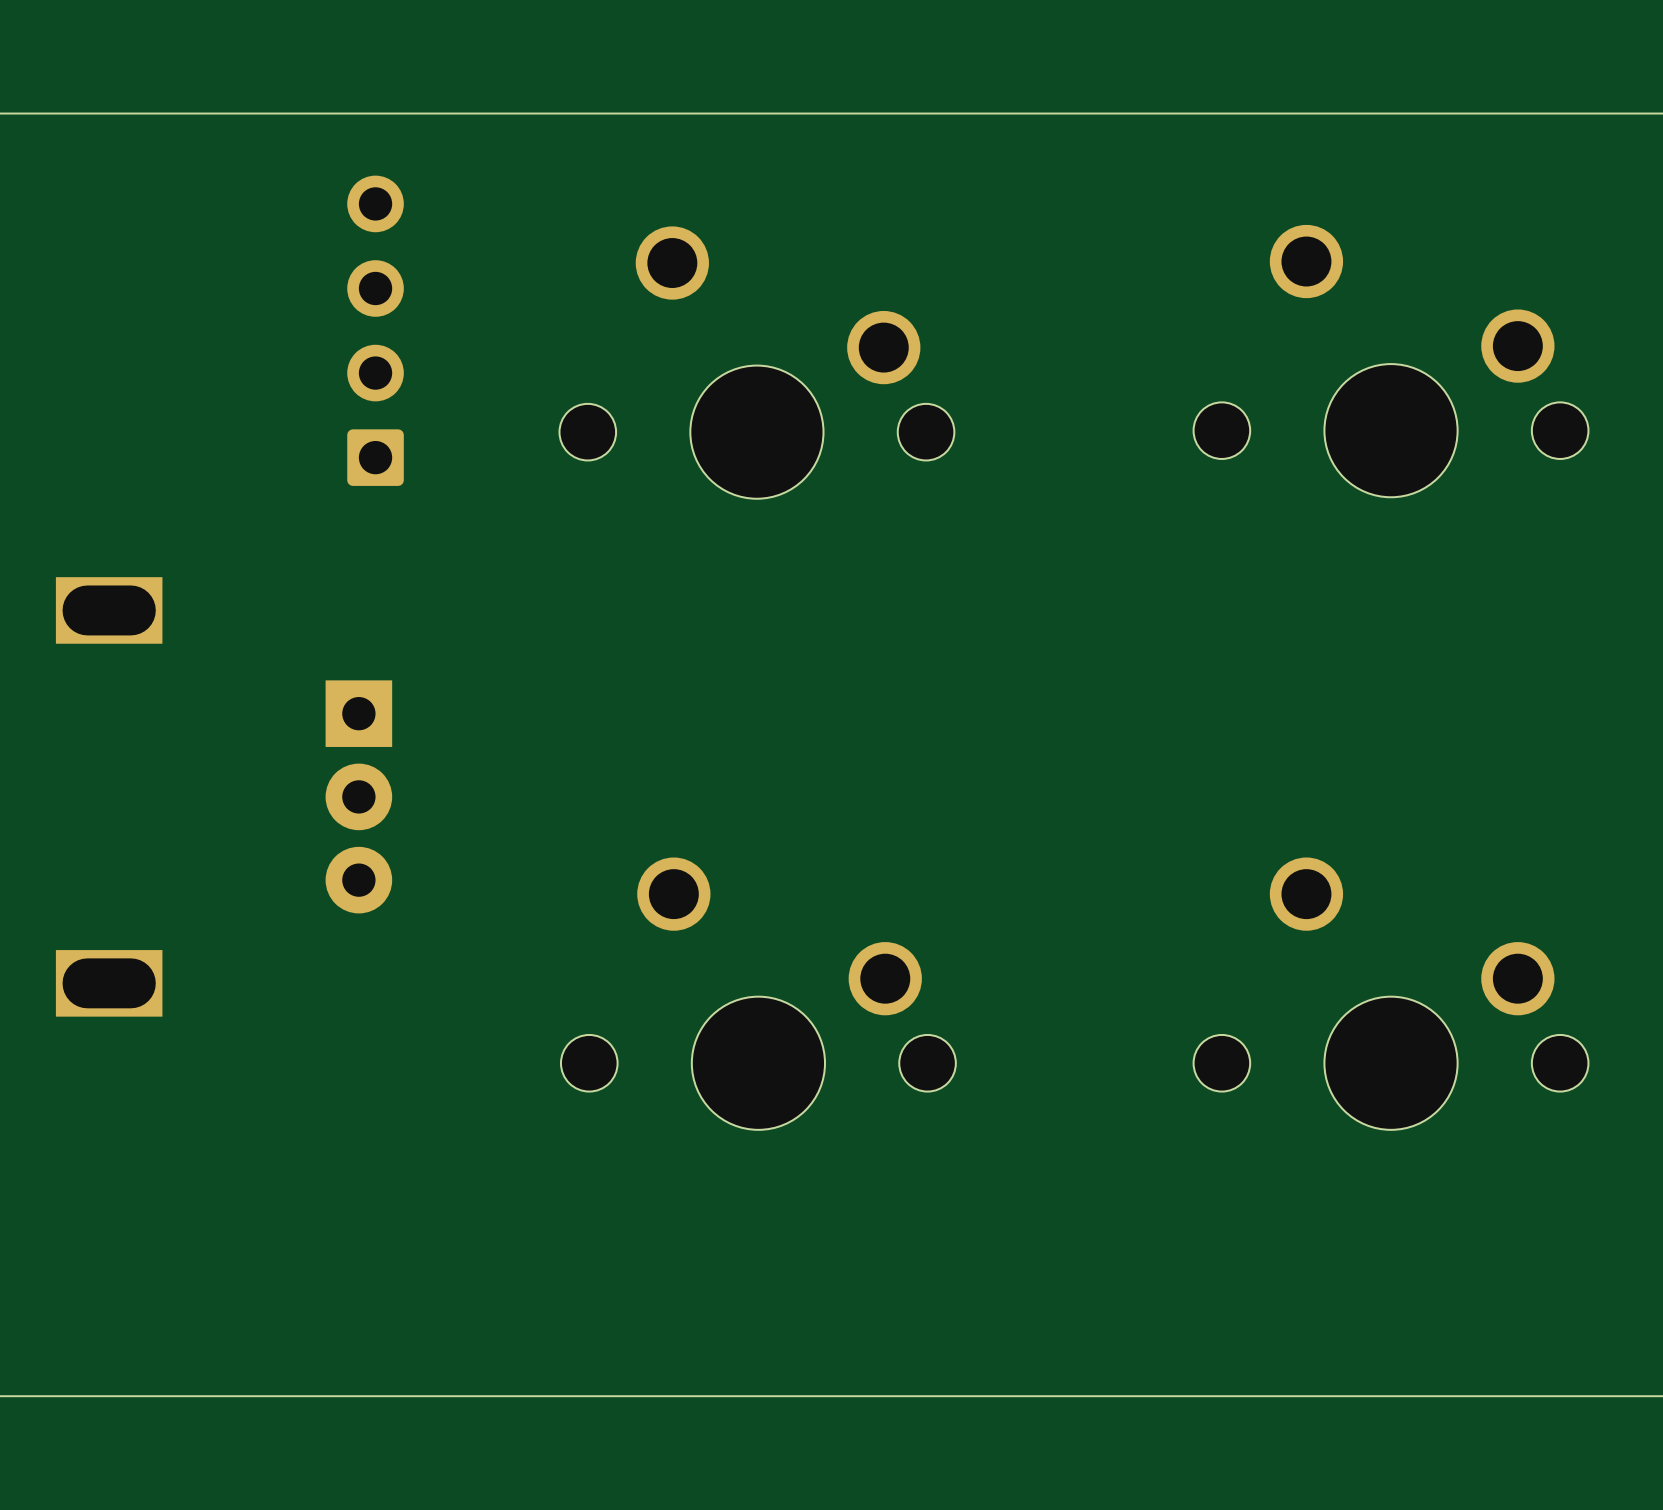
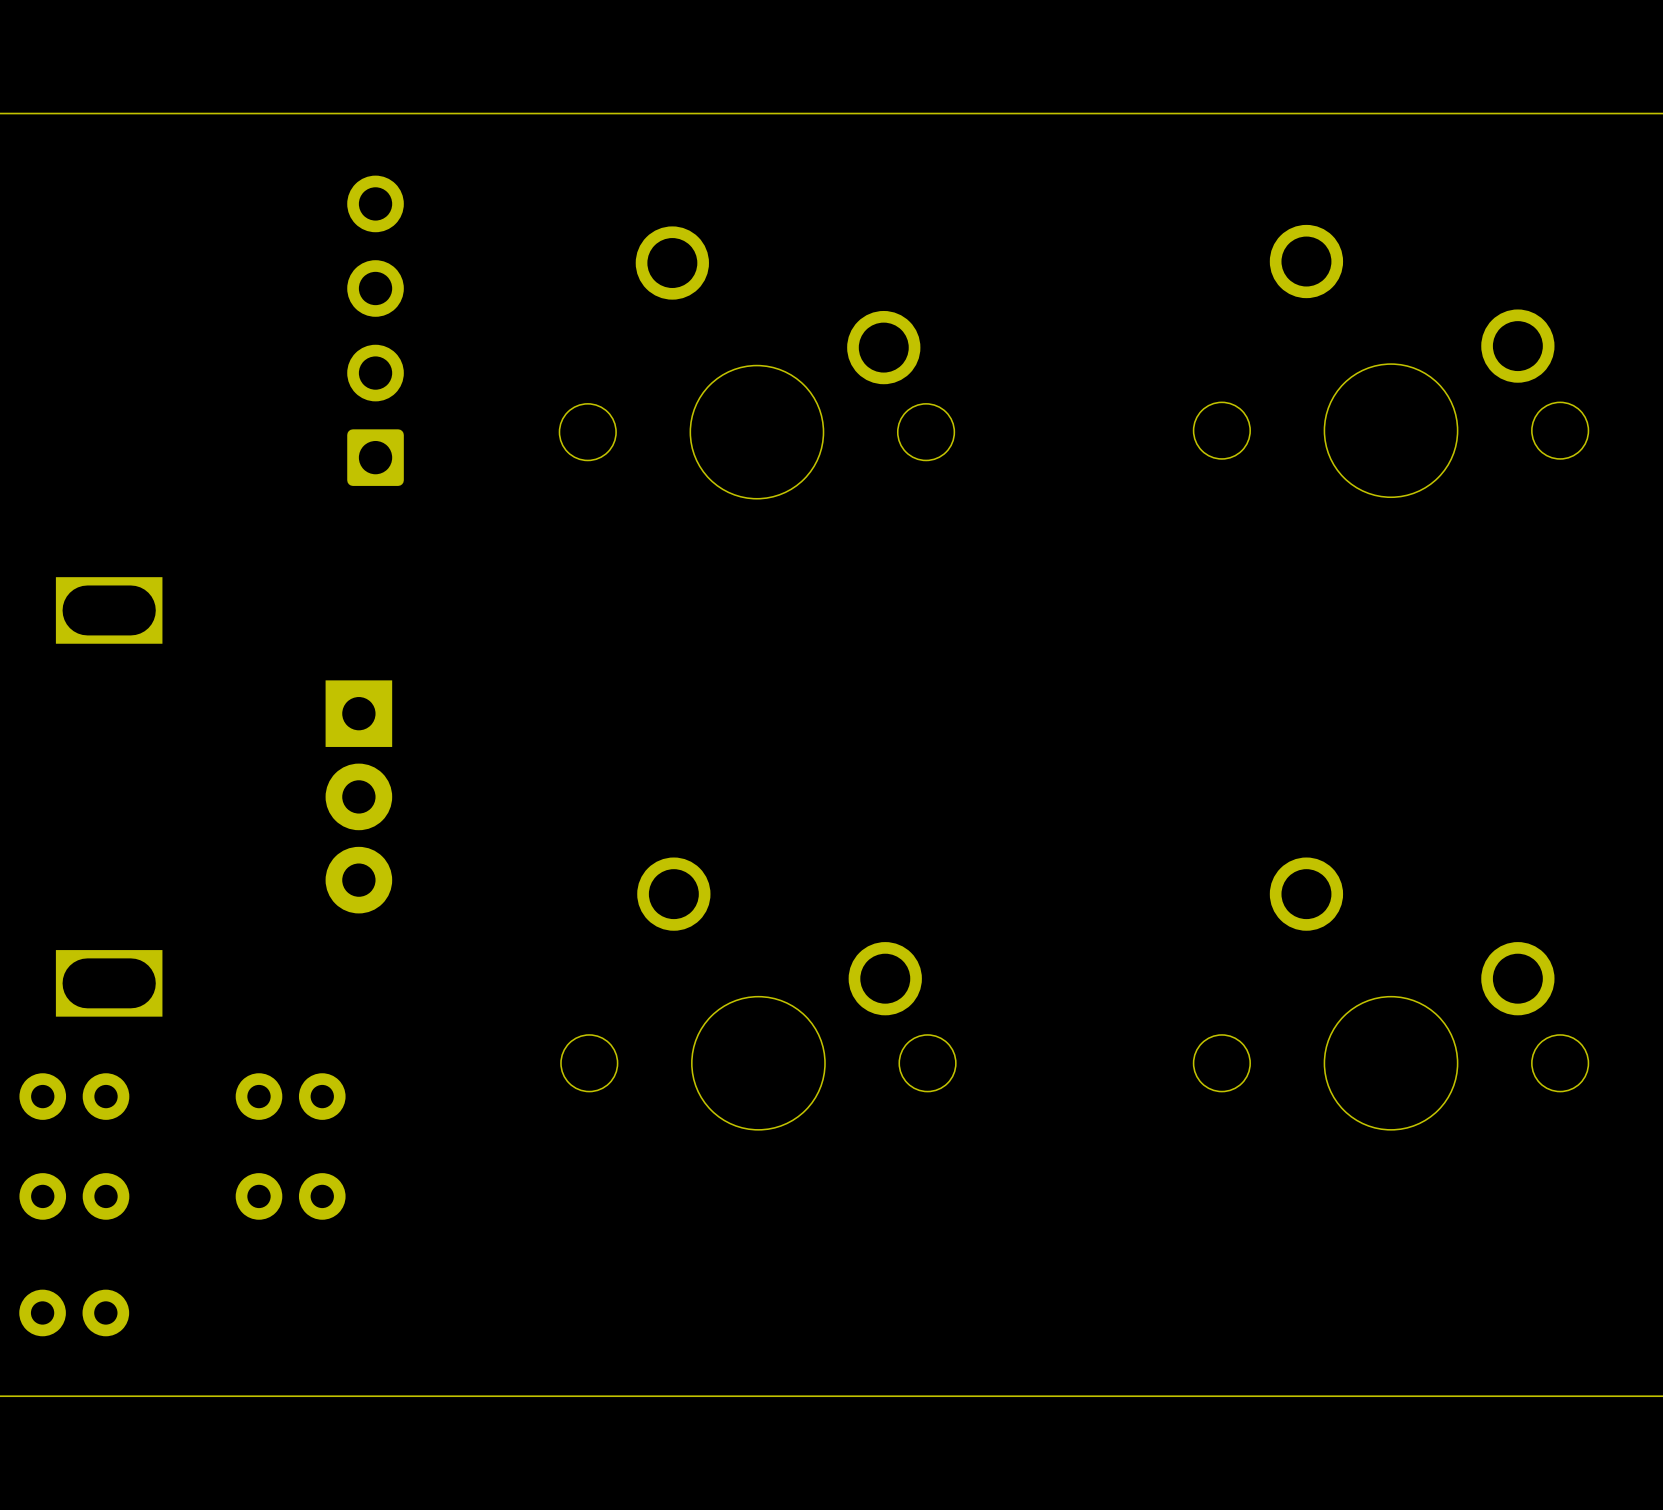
part: none -> (74, 1096)
part: none -> (290, 1096)
part: none -> (74, 1196)
part: none -> (290, 1196)
part: none -> (74, 1312)

